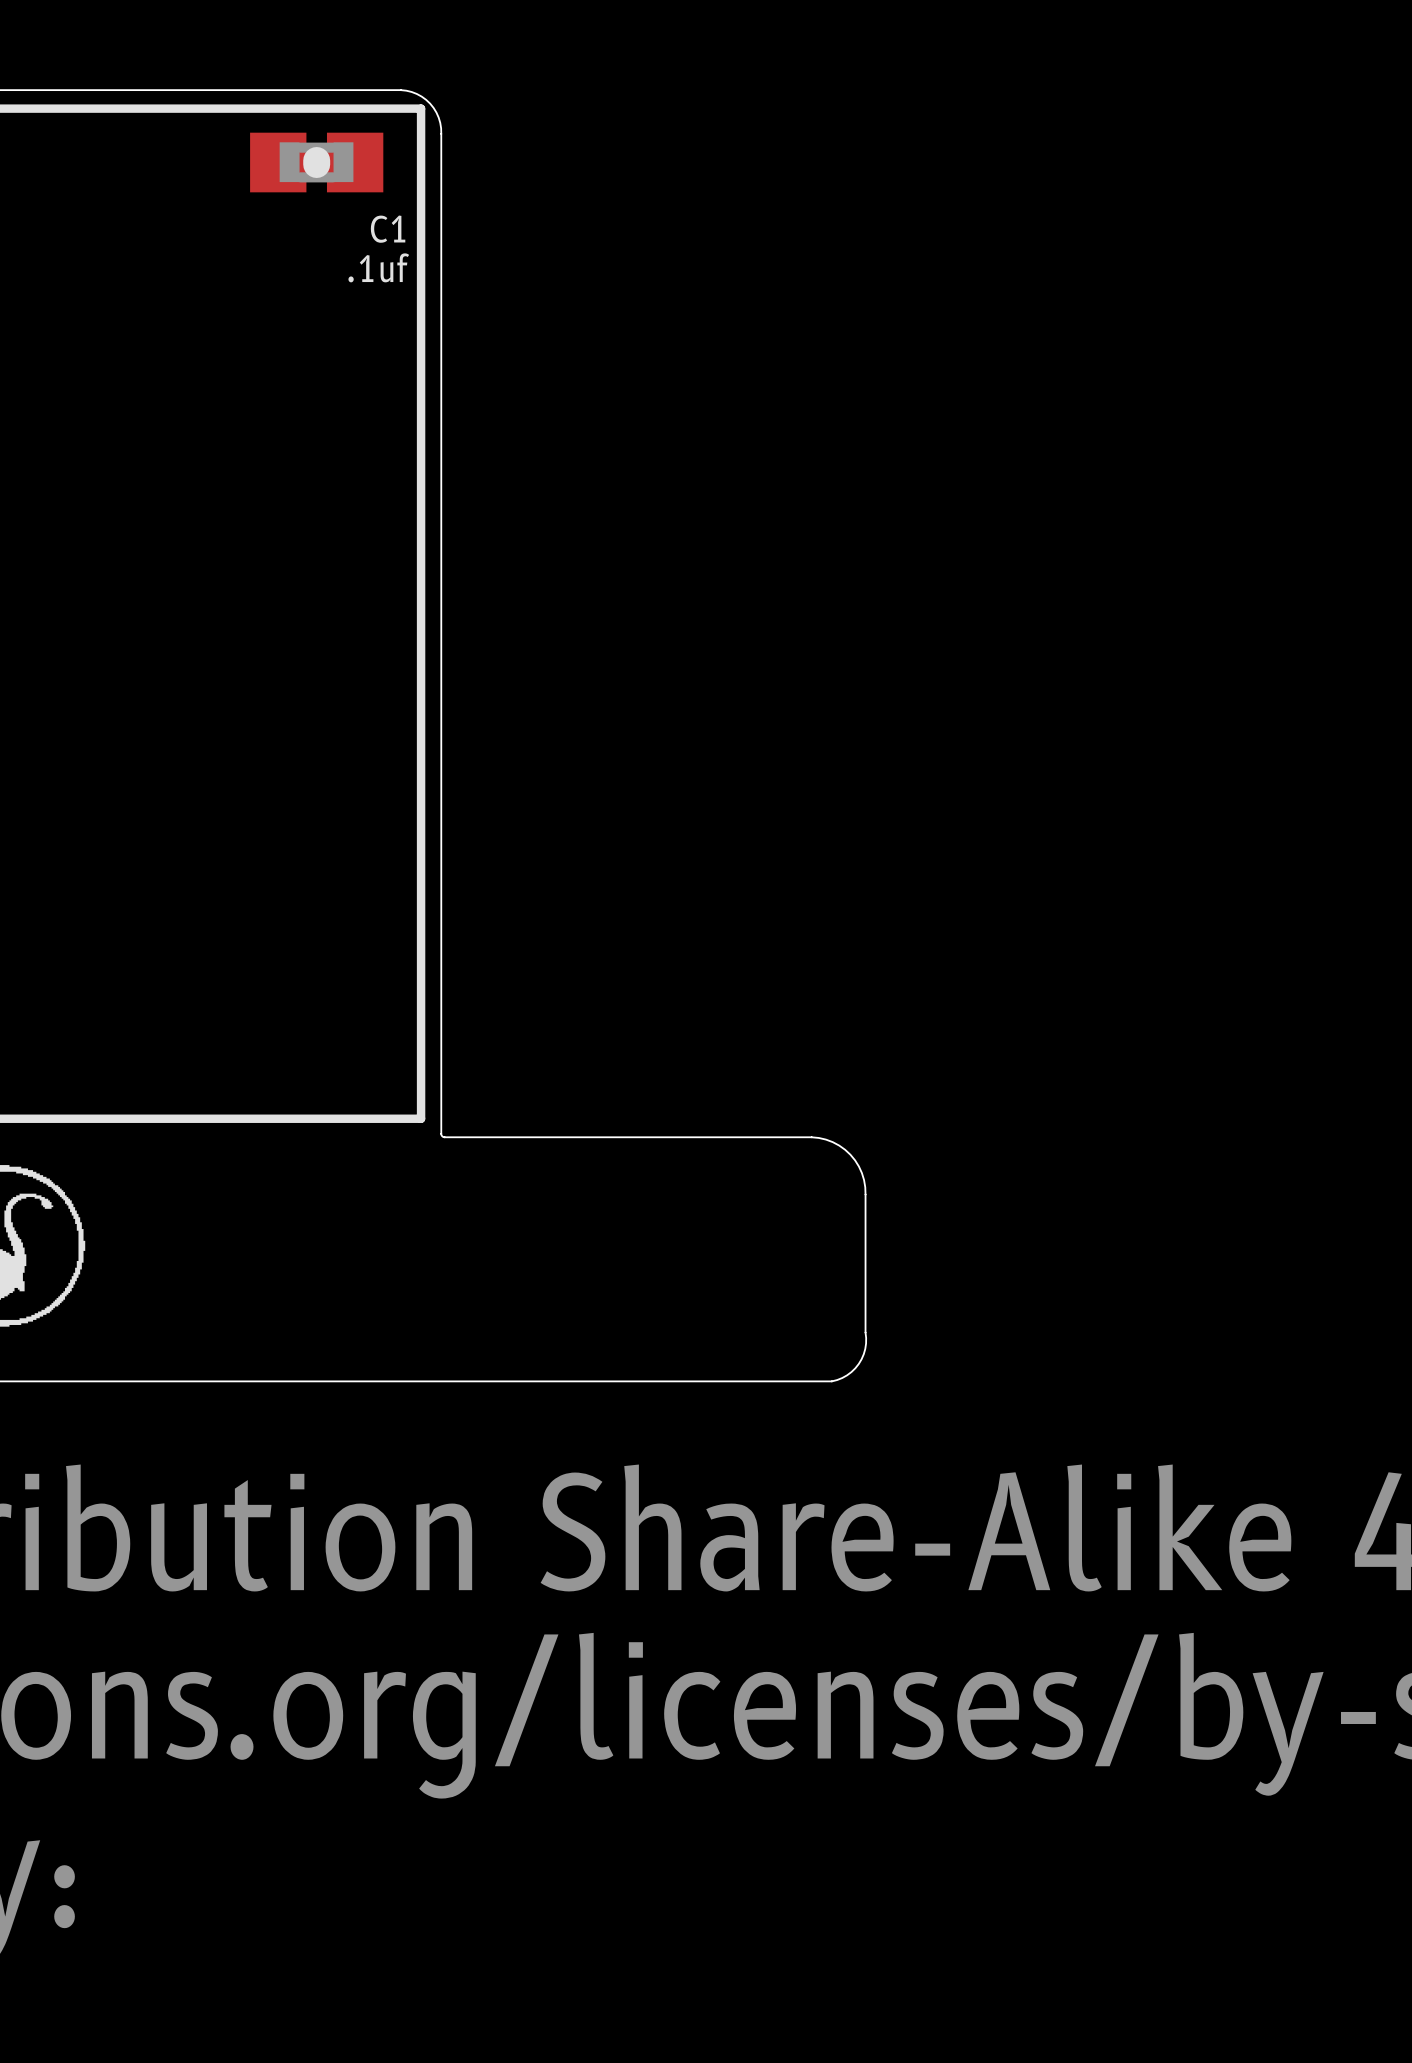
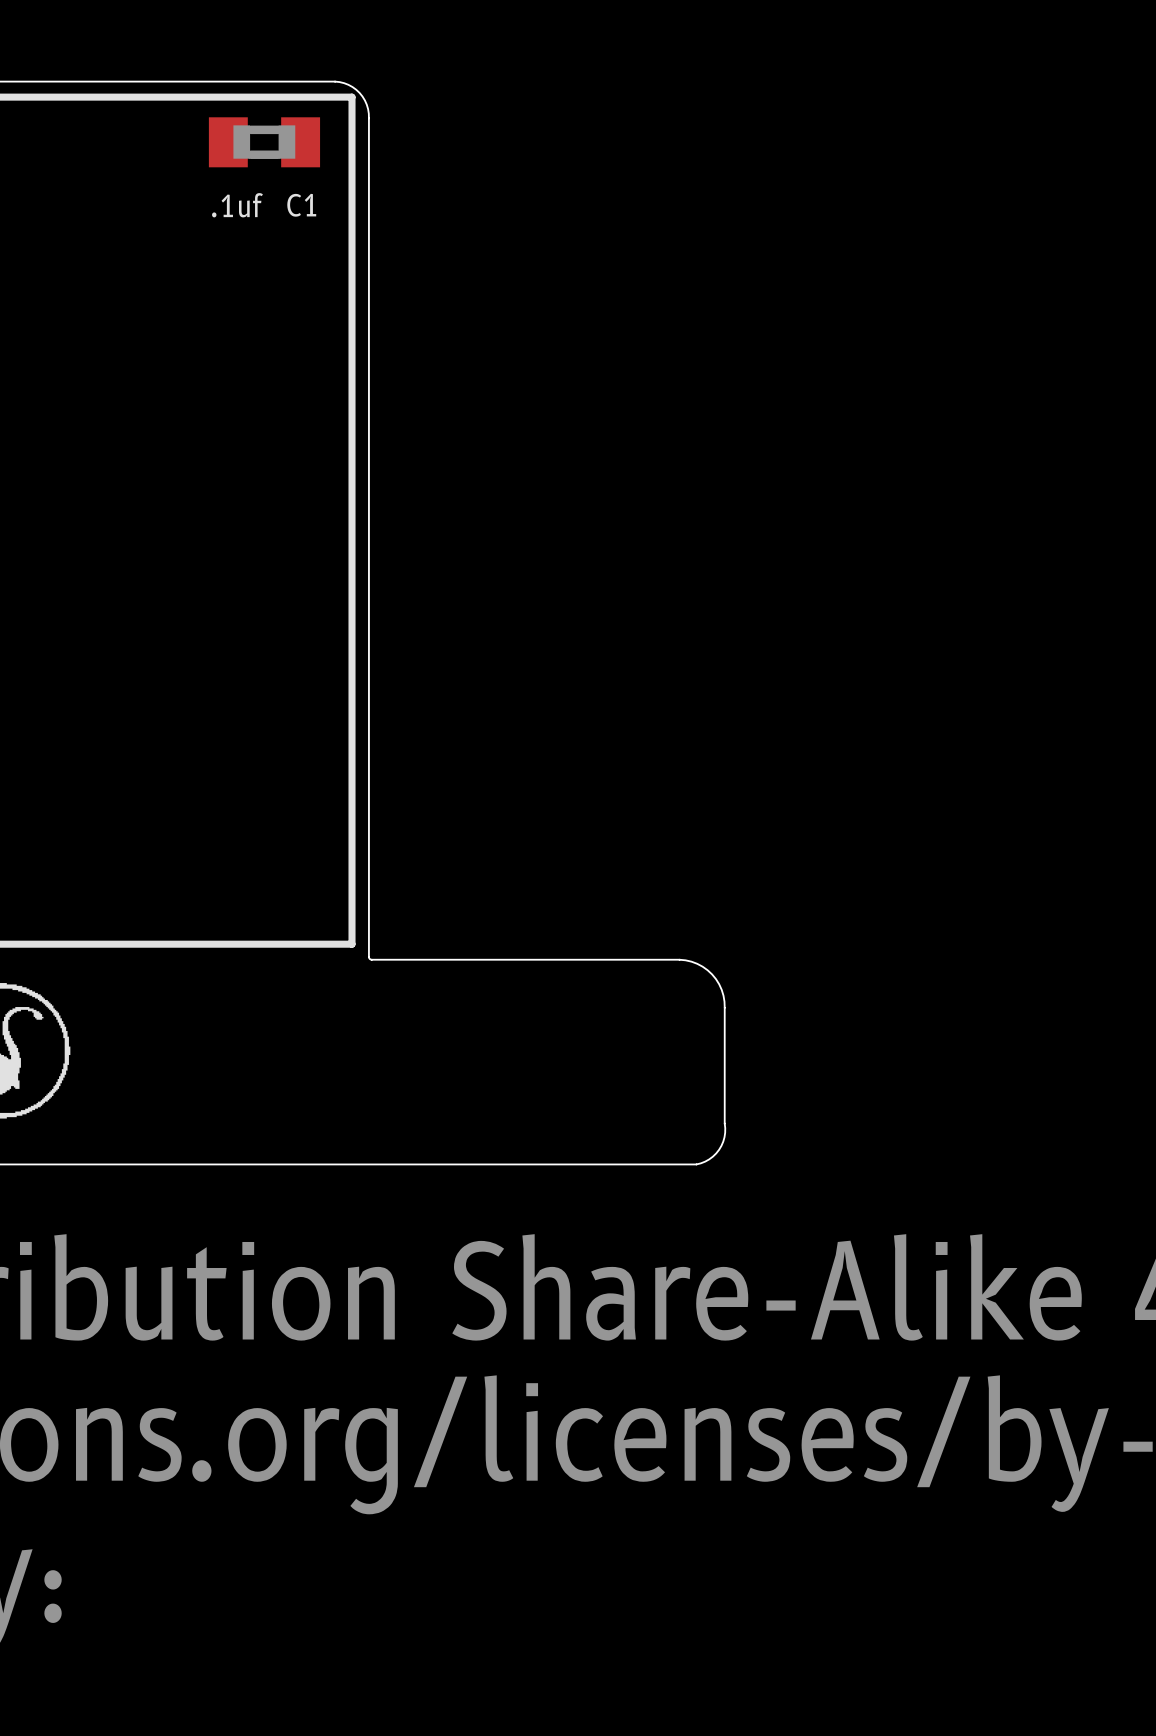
C1 footprint: [250, 132, 384, 193] -> [208, 117, 321, 168]

